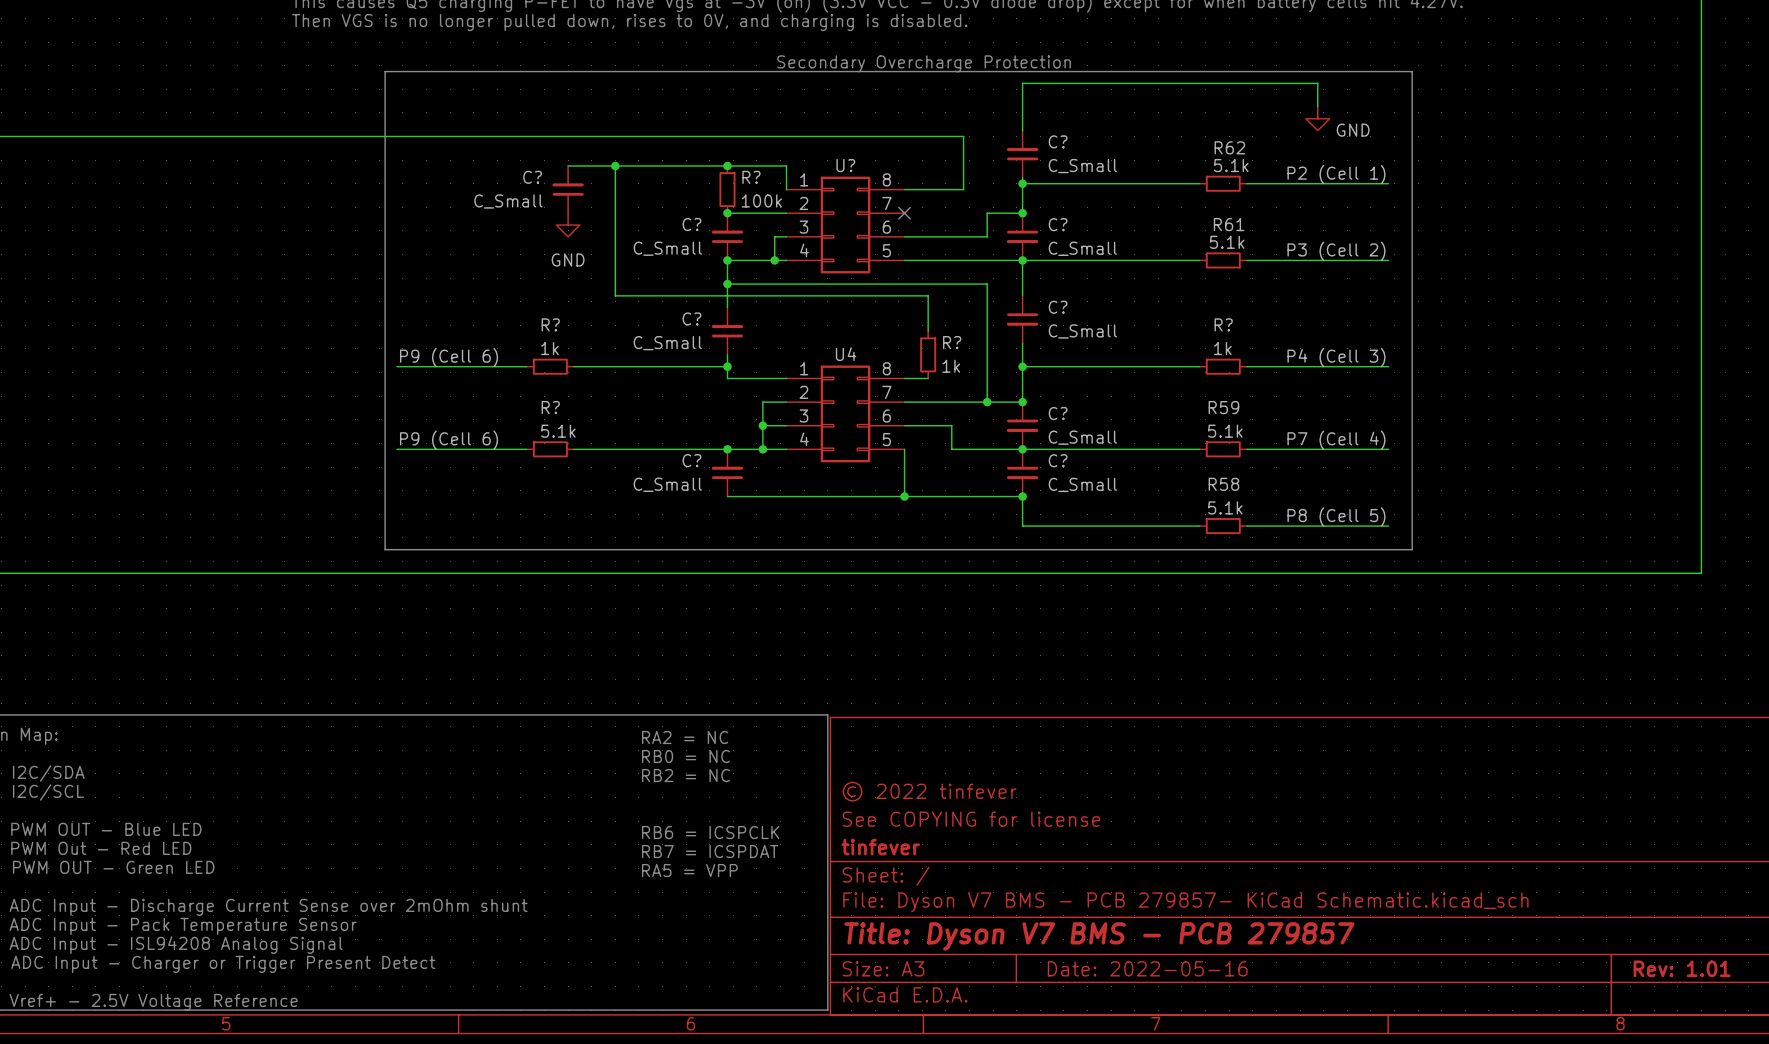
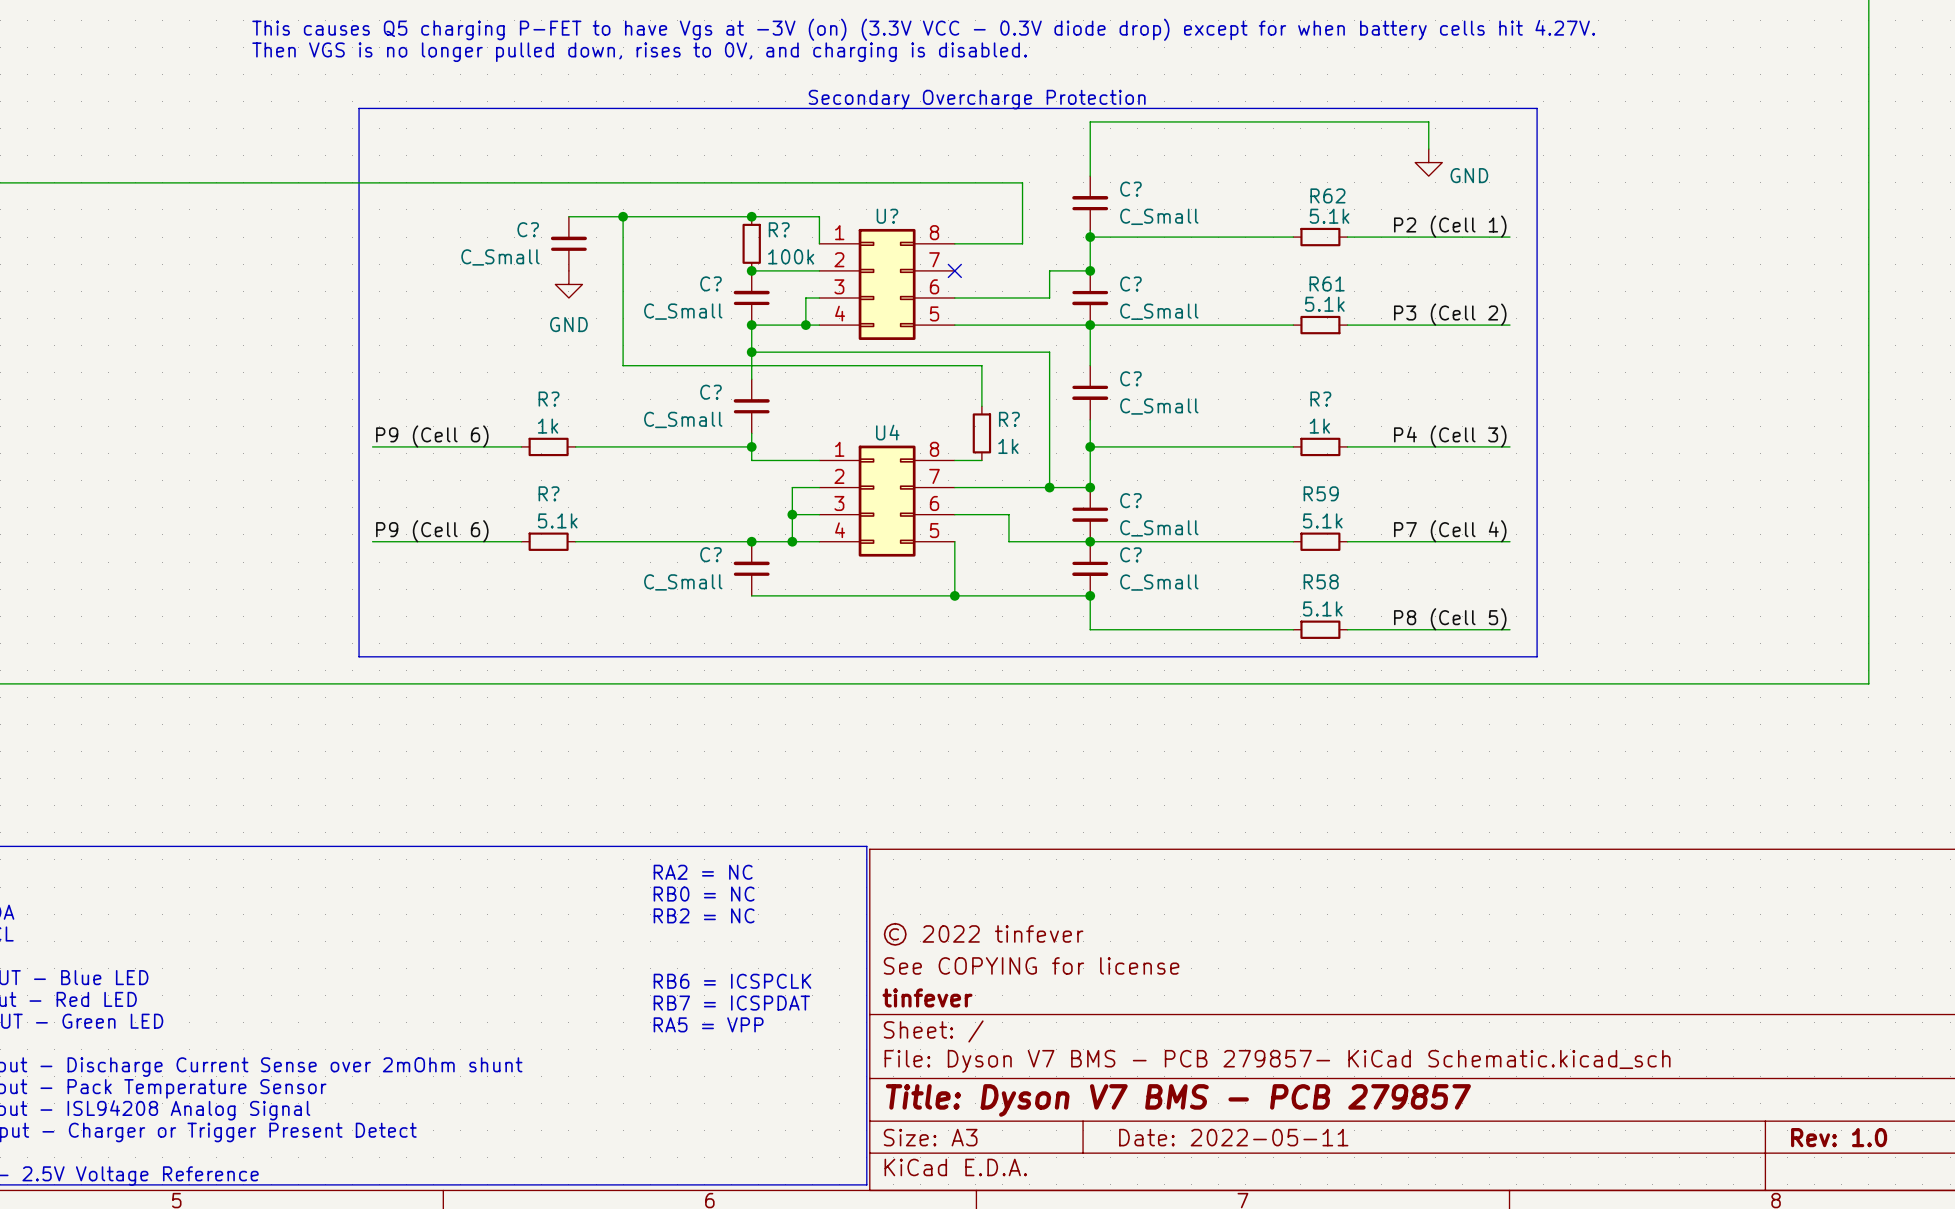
title block: Date: 2022-05-16 (1147, 968) -> Date: 2022-05-11 (1233, 1137)
title block: Rev: 1.01 (1682, 968) -> Rev: 1.0 (1839, 1137)

